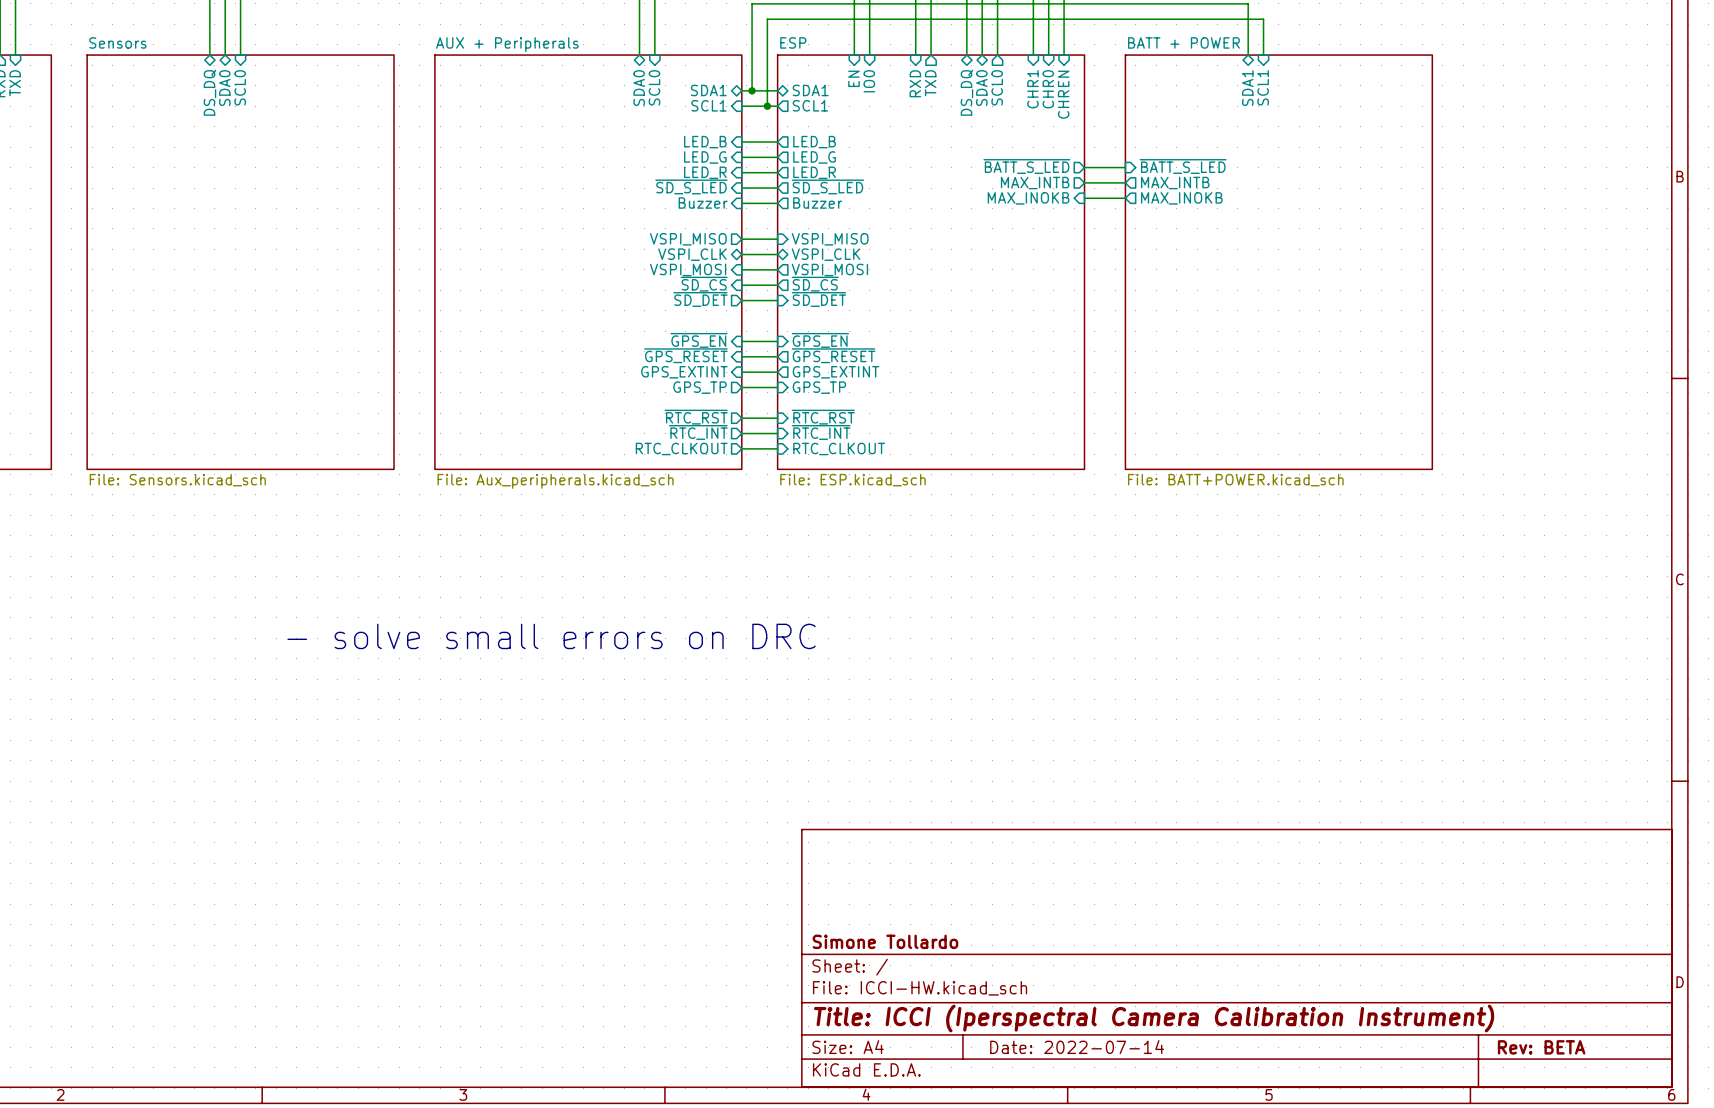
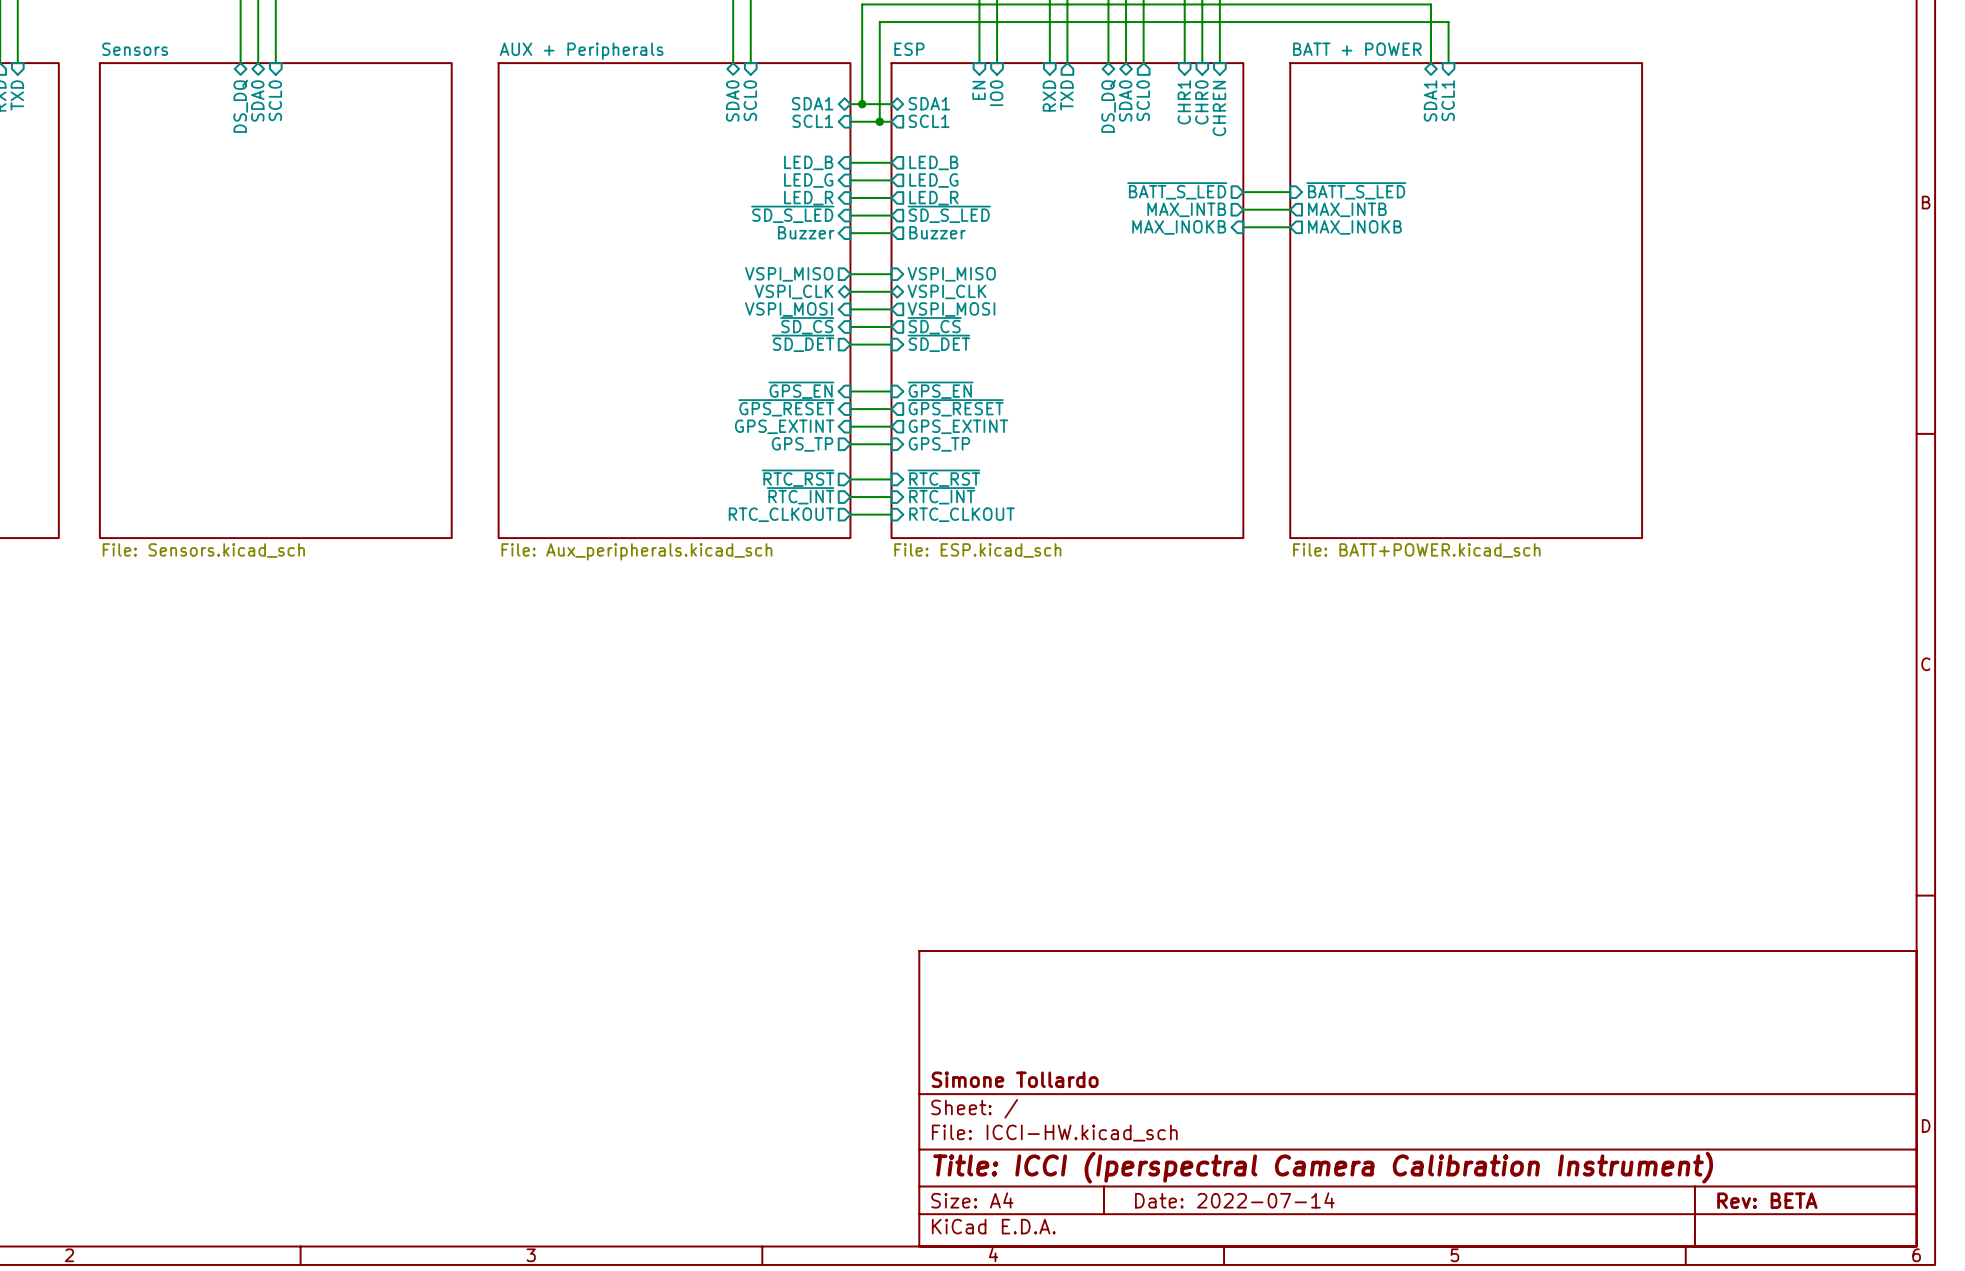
text: - solve small errors on DRC (551, 636) -> none

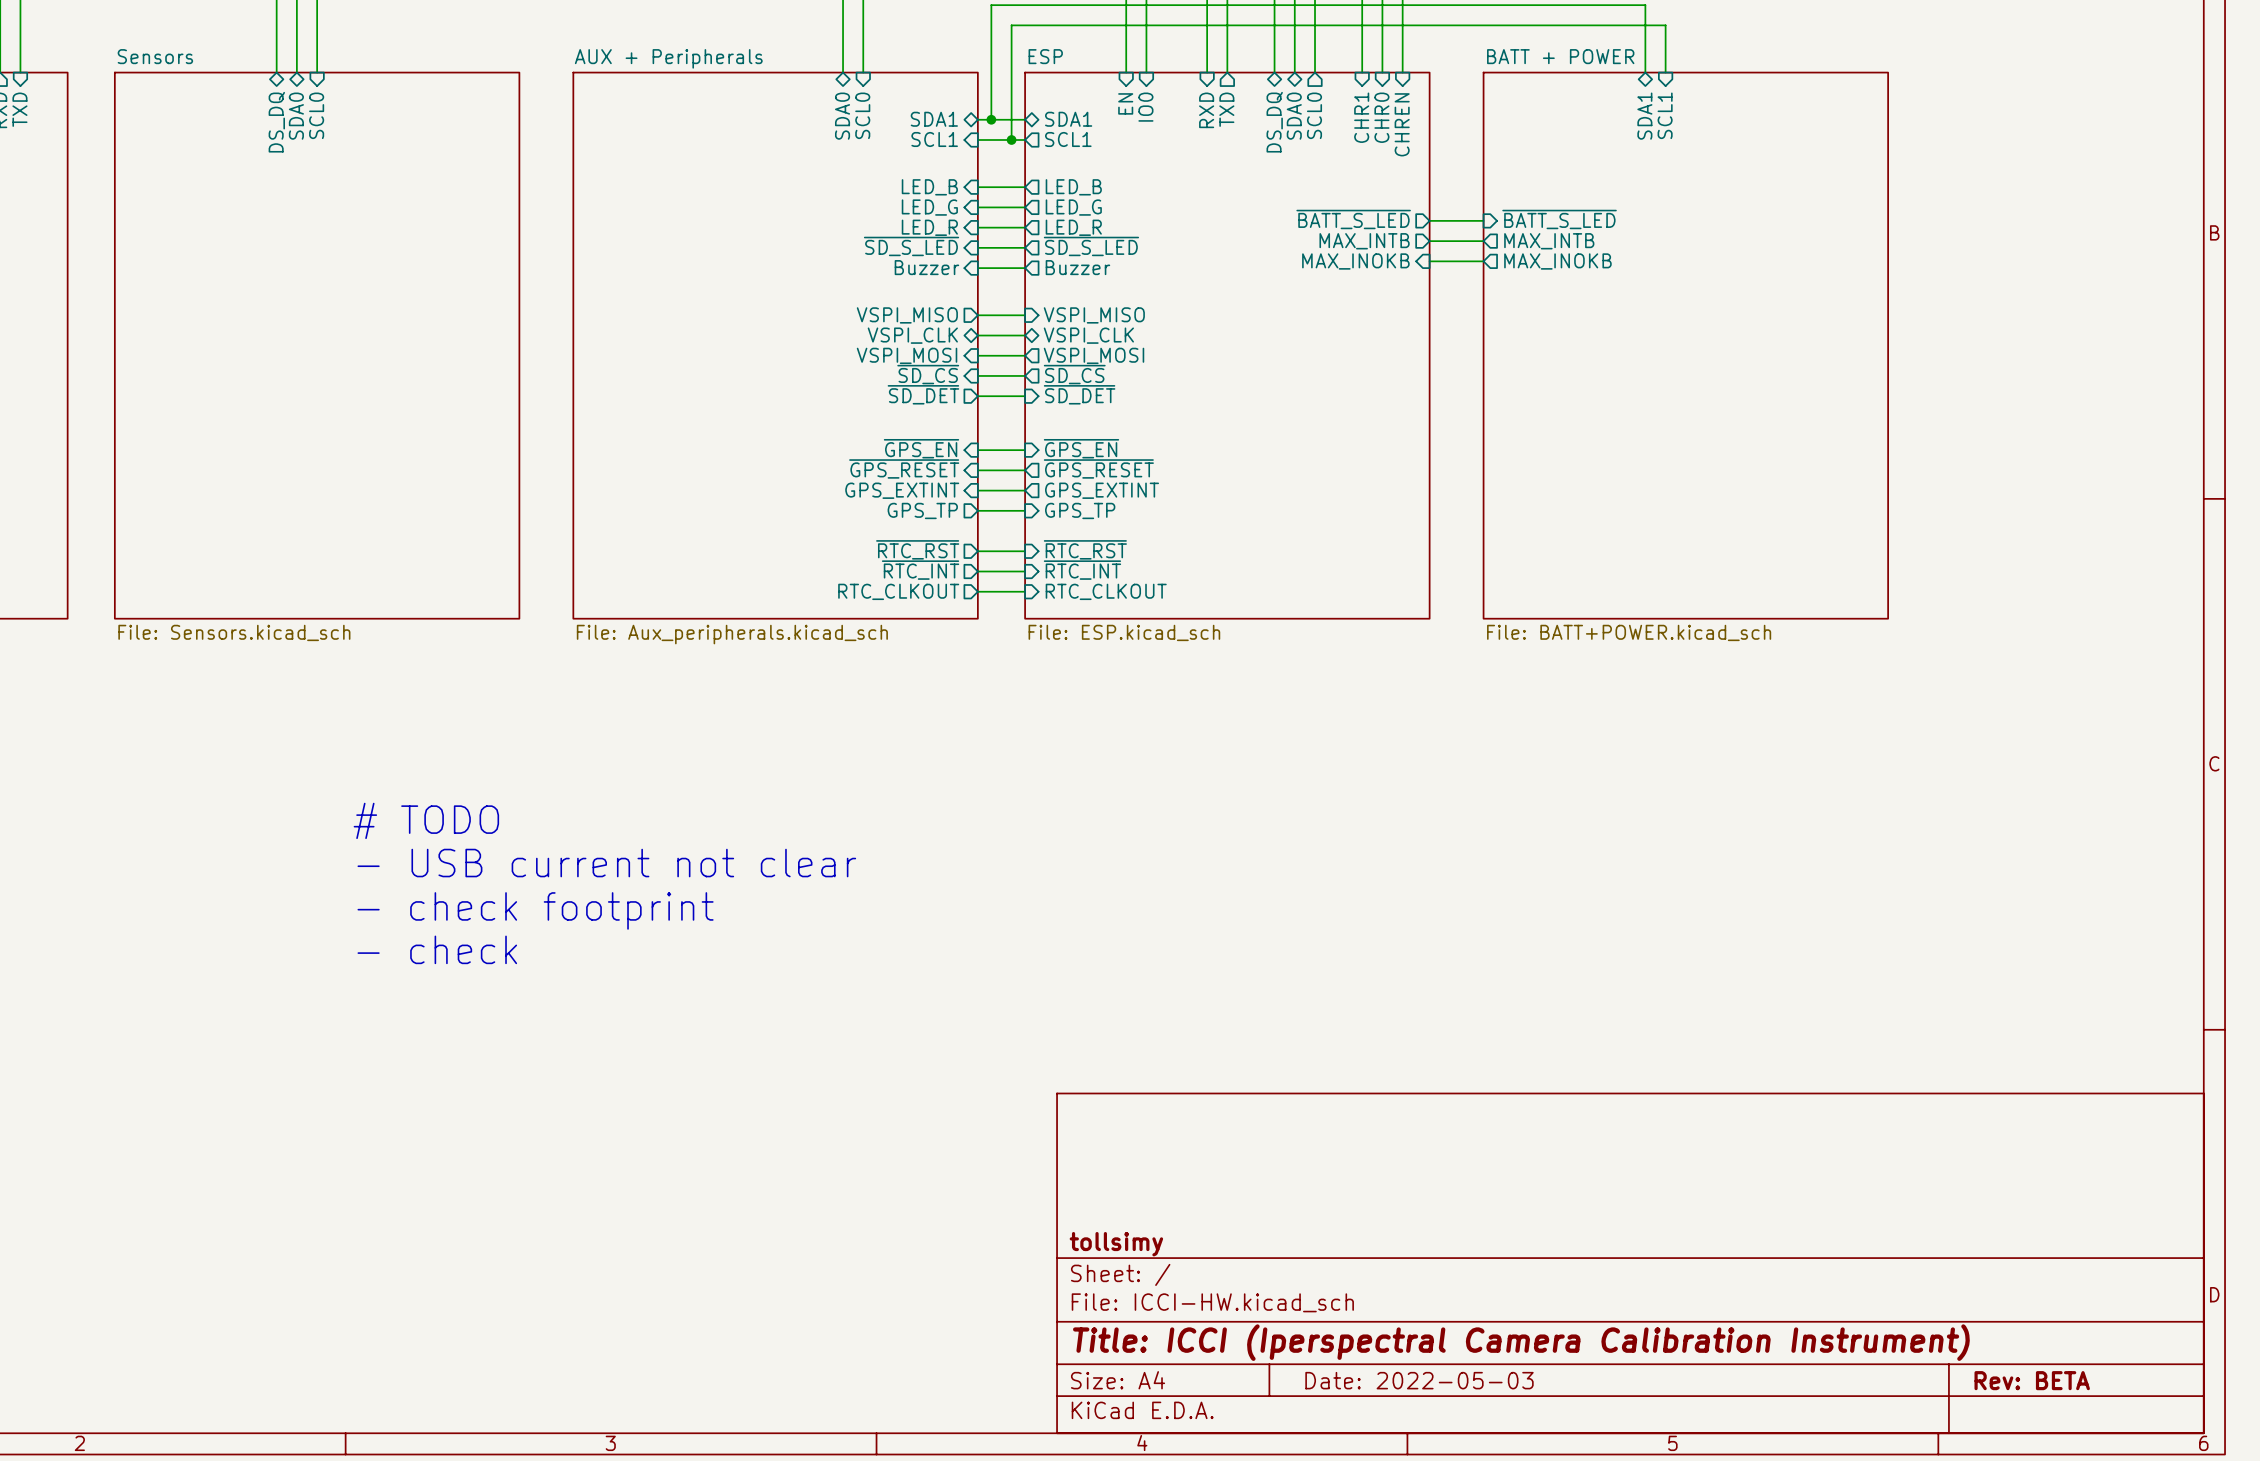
text: none -> # TODO (426, 820)
text: none -> - USB current not clear (606, 863)
text: none -> - check footprint (535, 910)
text: none -> - check (437, 949)
title block: Simone Tollardo (1015, 1079) -> tollsimy (1116, 1244)
title block: Date: 2022-07-14 (1234, 1200) -> Date: 2022-05-03 (1419, 1380)

